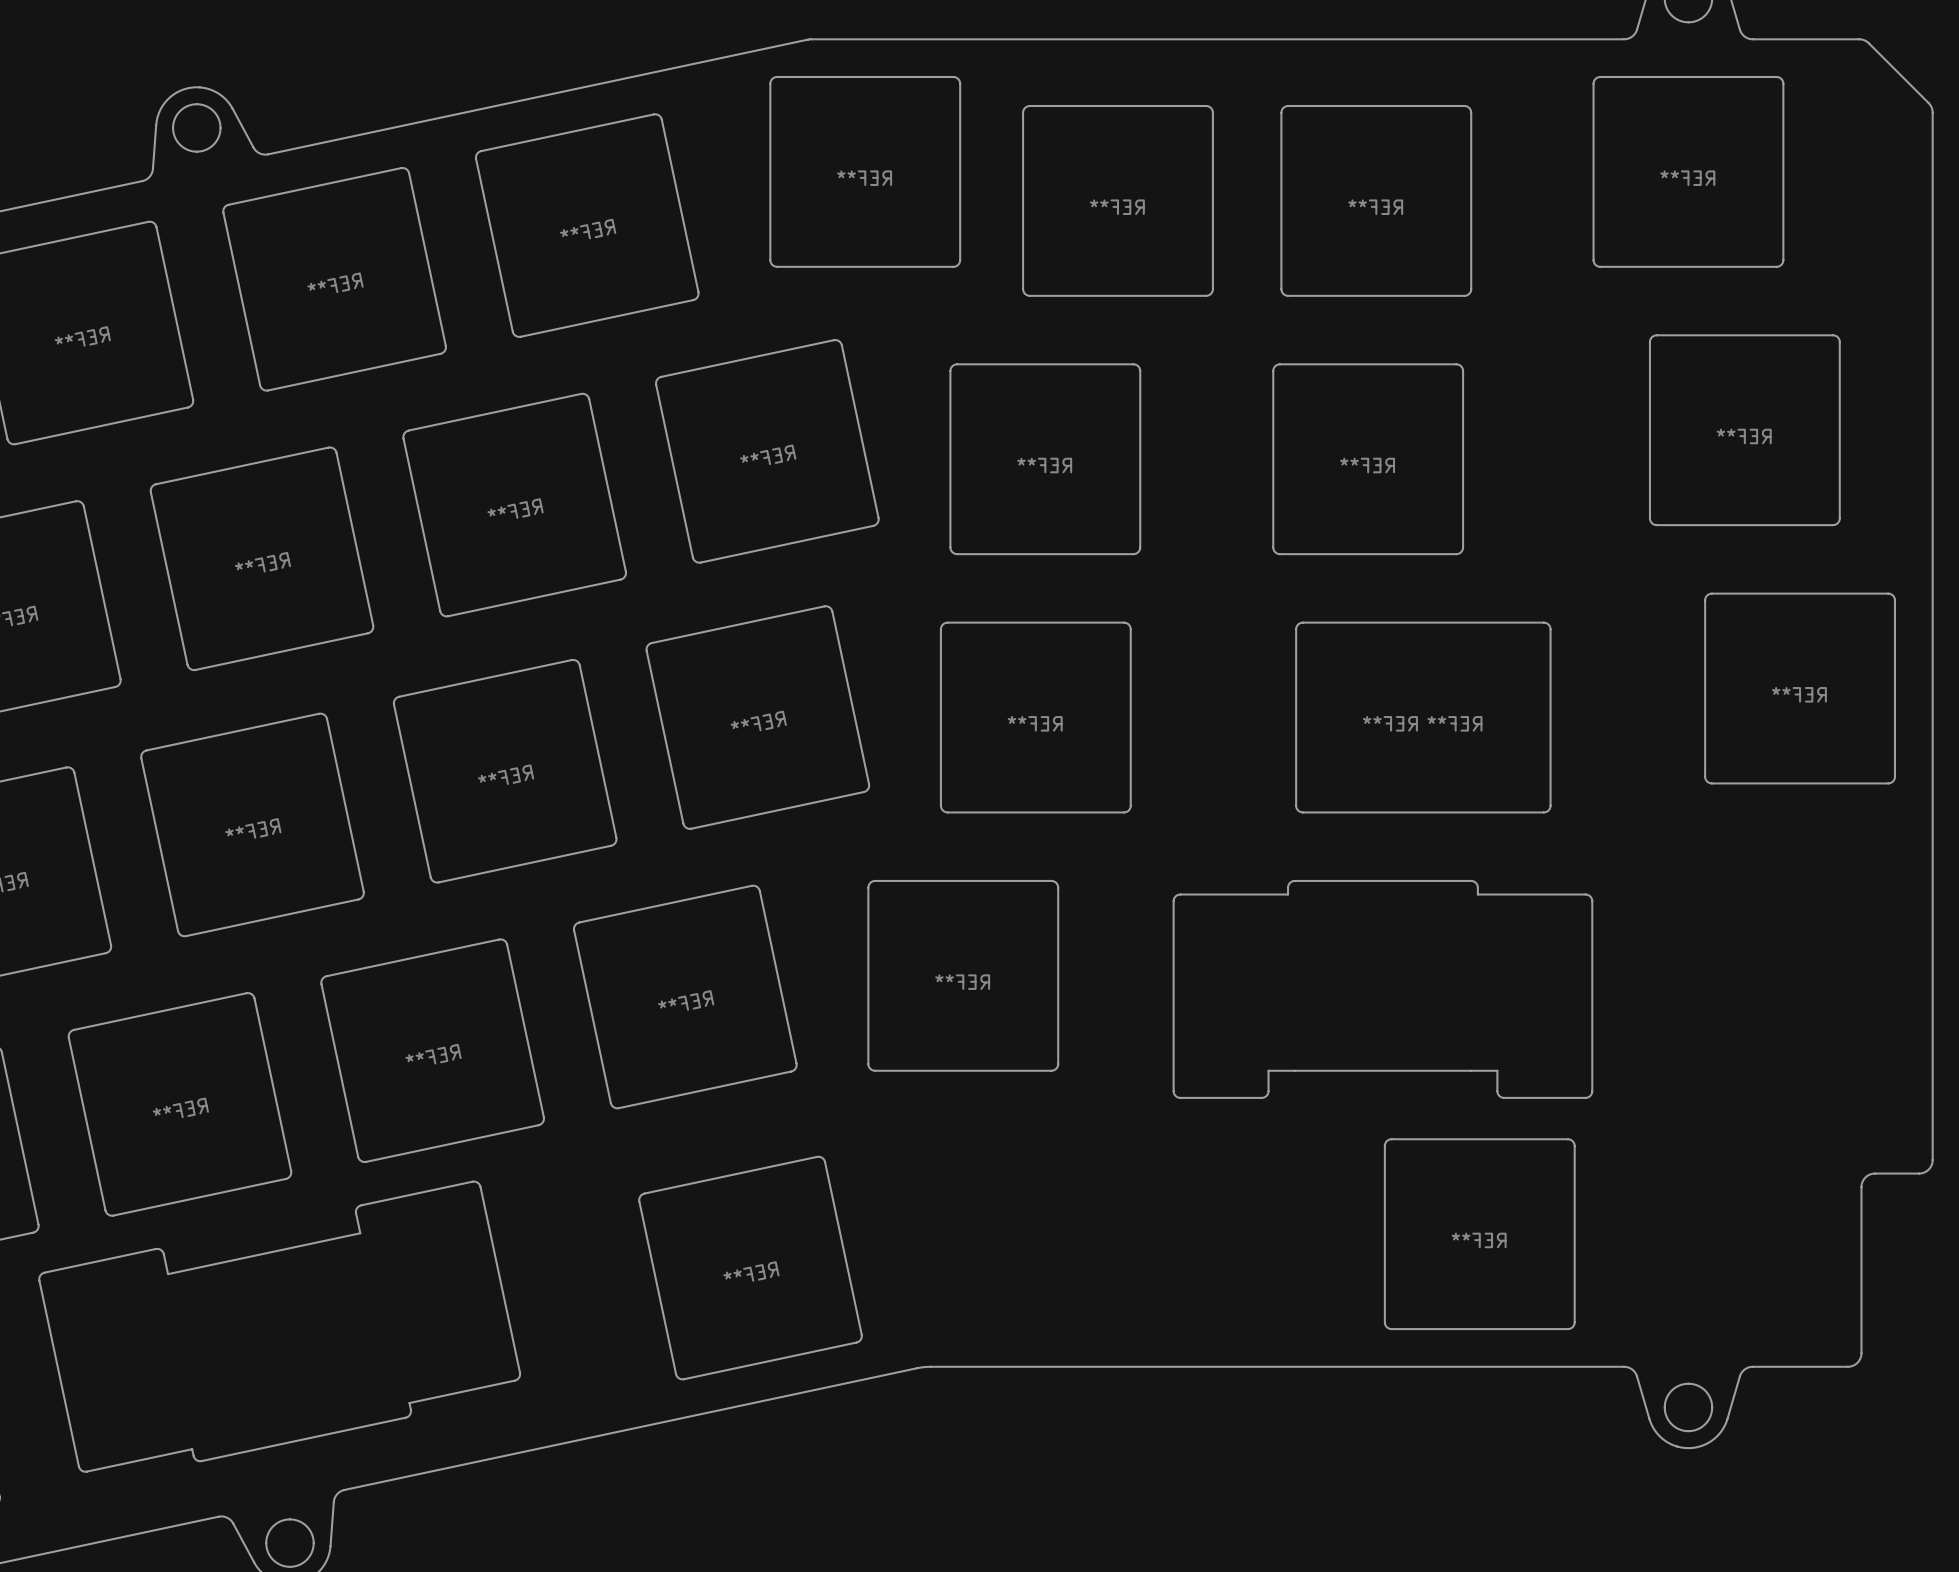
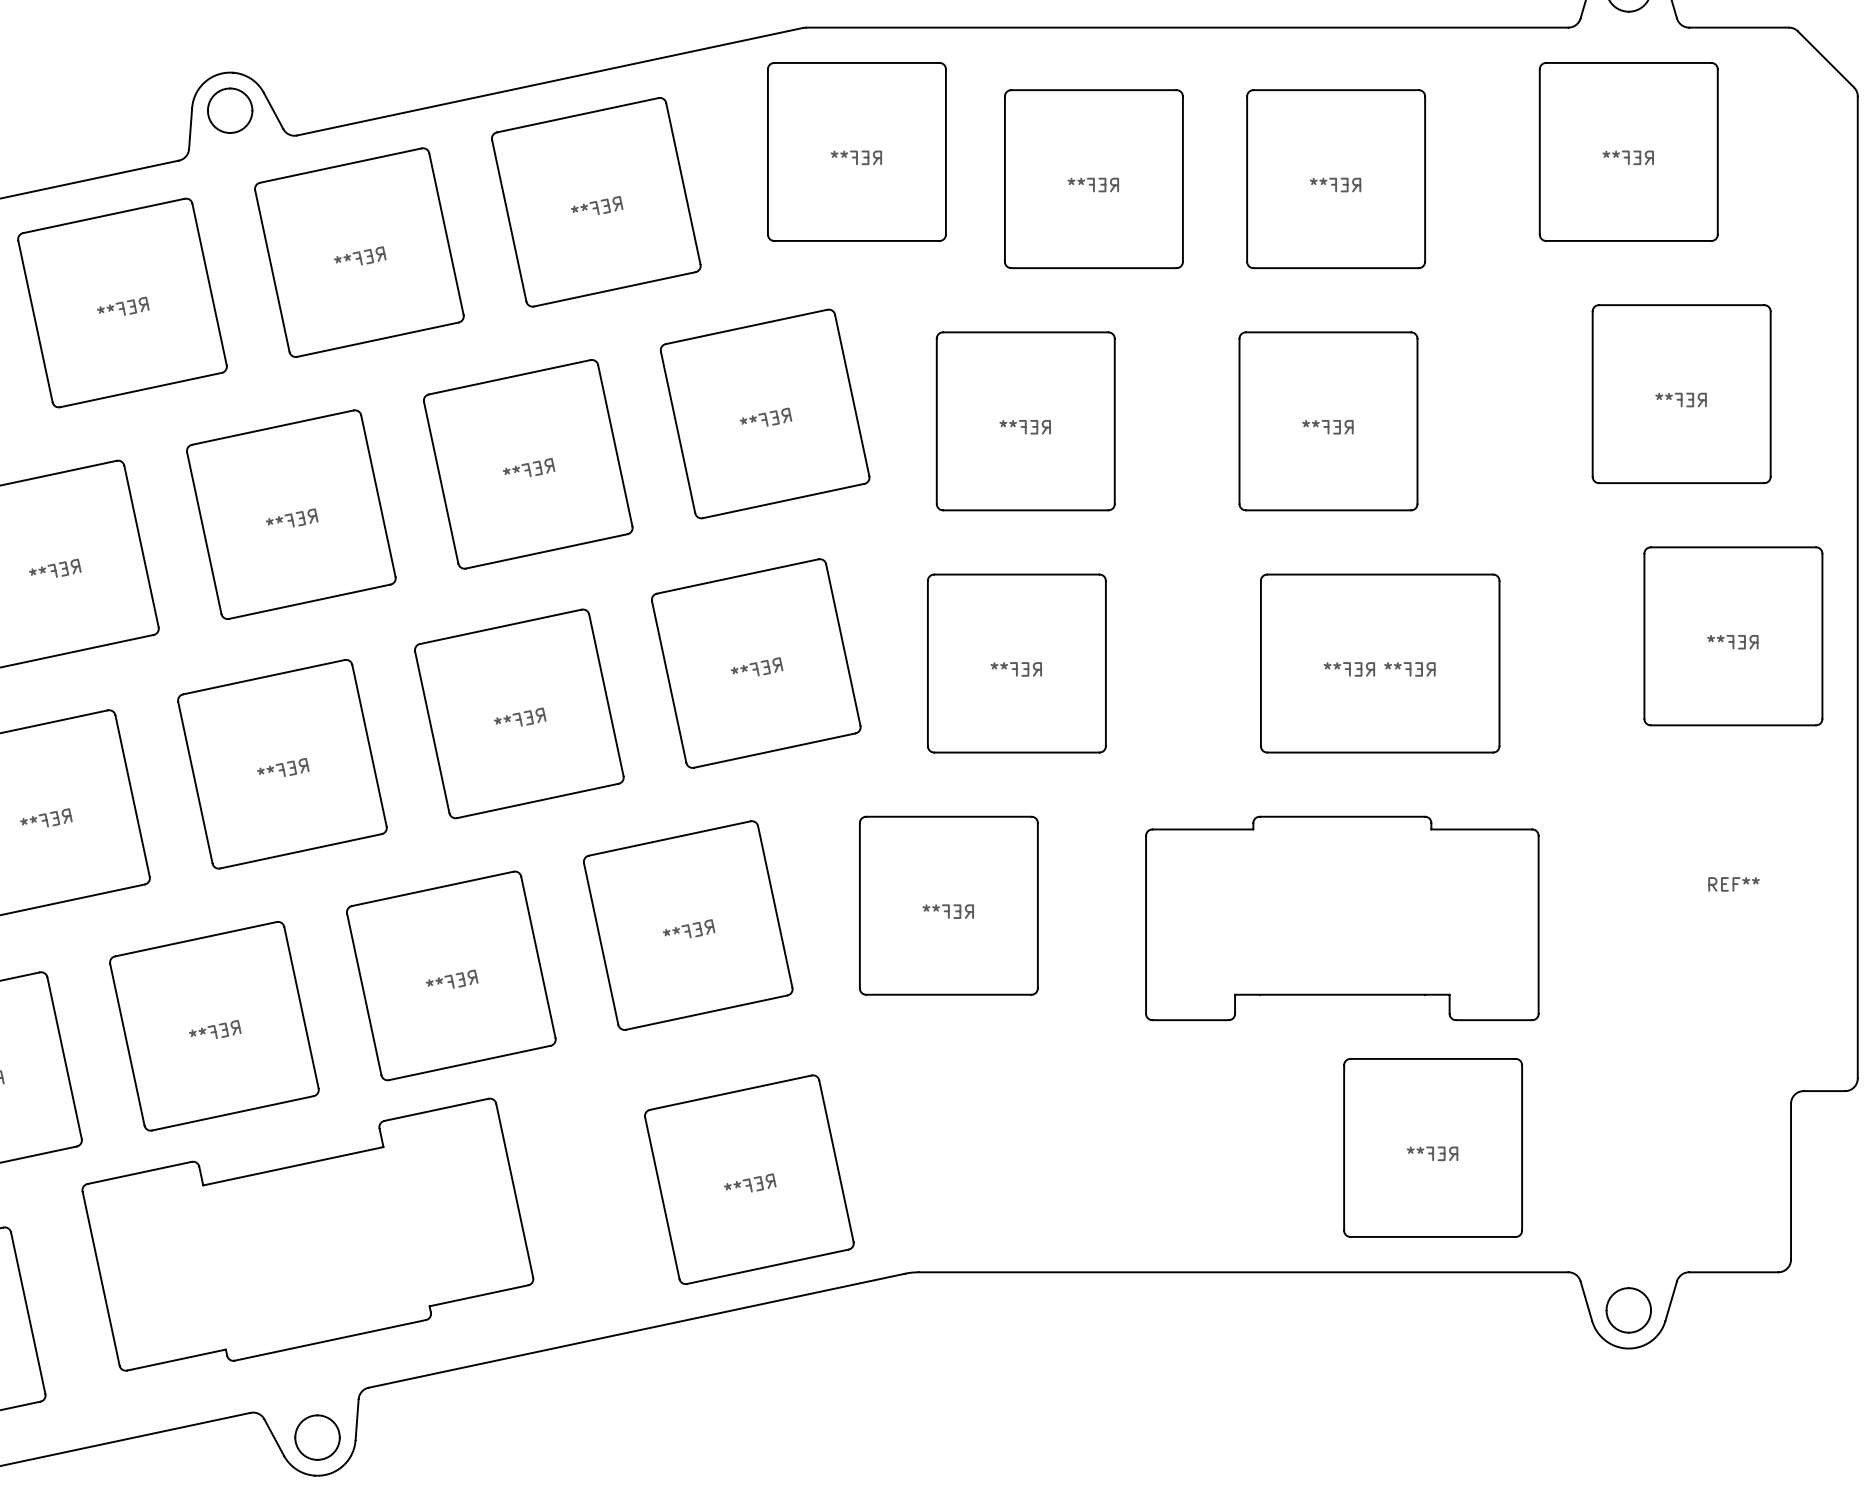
REF**: none -> (1734, 884)

